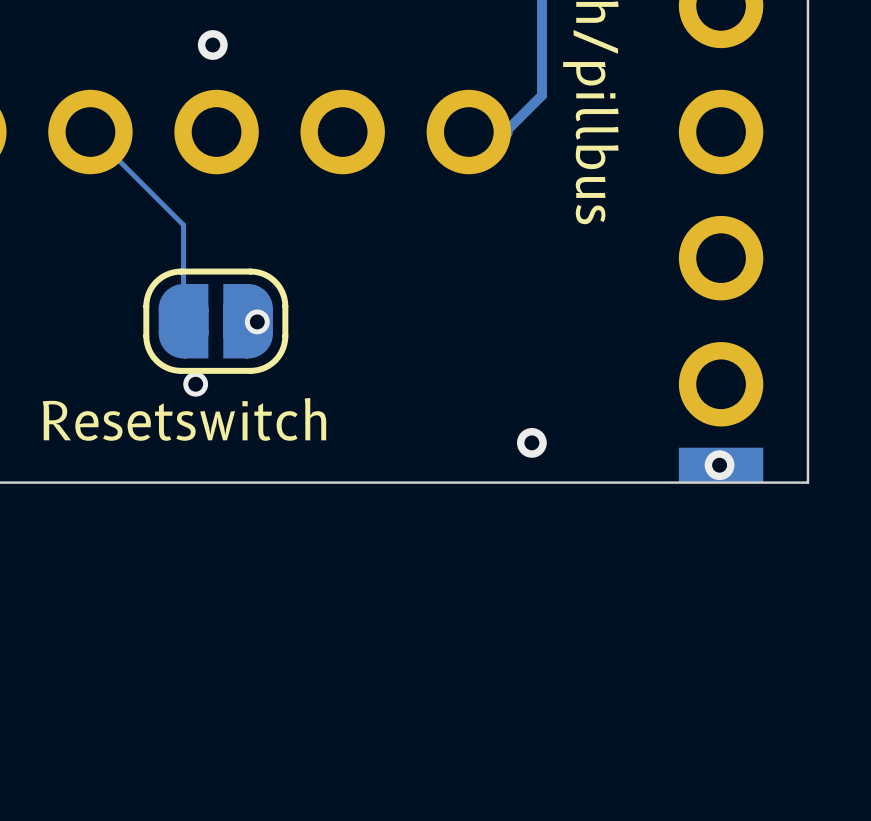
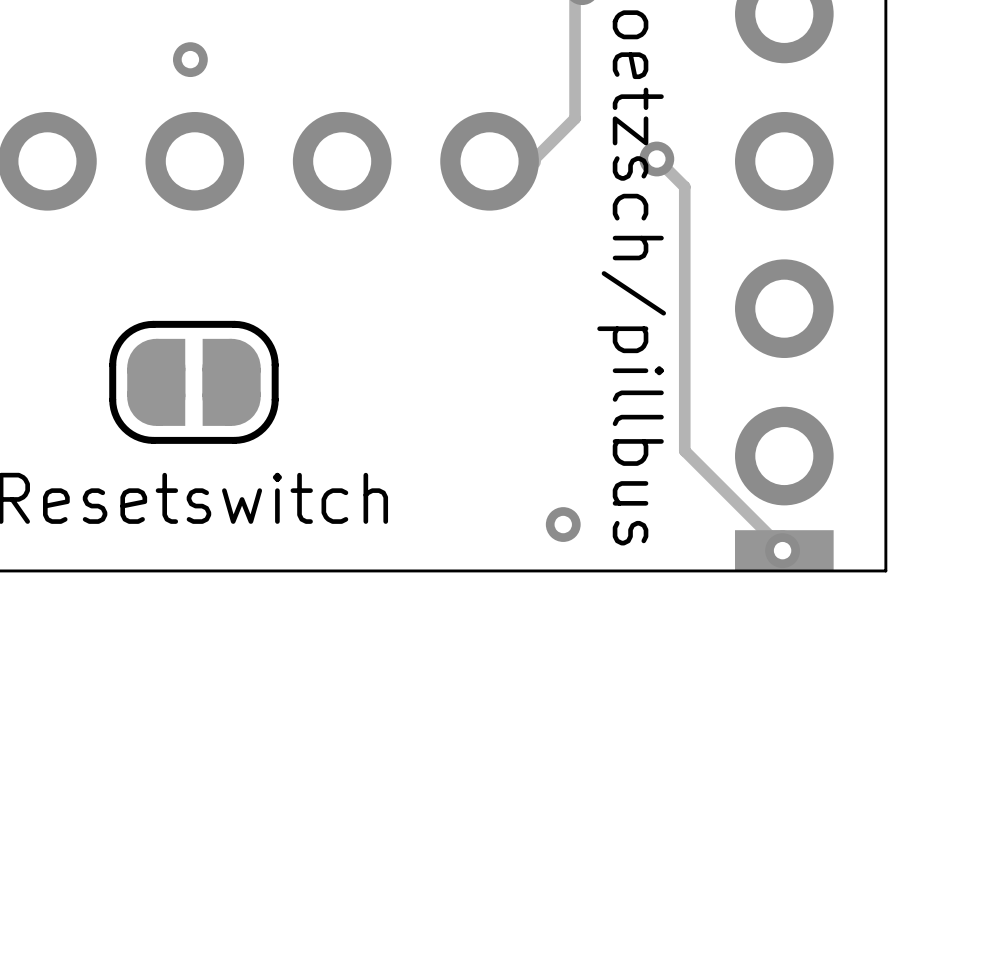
track: none -> (656, 158) (684, 186) (684, 450) (770, 536) (784, 536)
via: none -> (656, 158)
track: (90, 132) (183, 225) (183, 321) -> none
via: (257, 321) -> none
via: (195, 384) -> none

